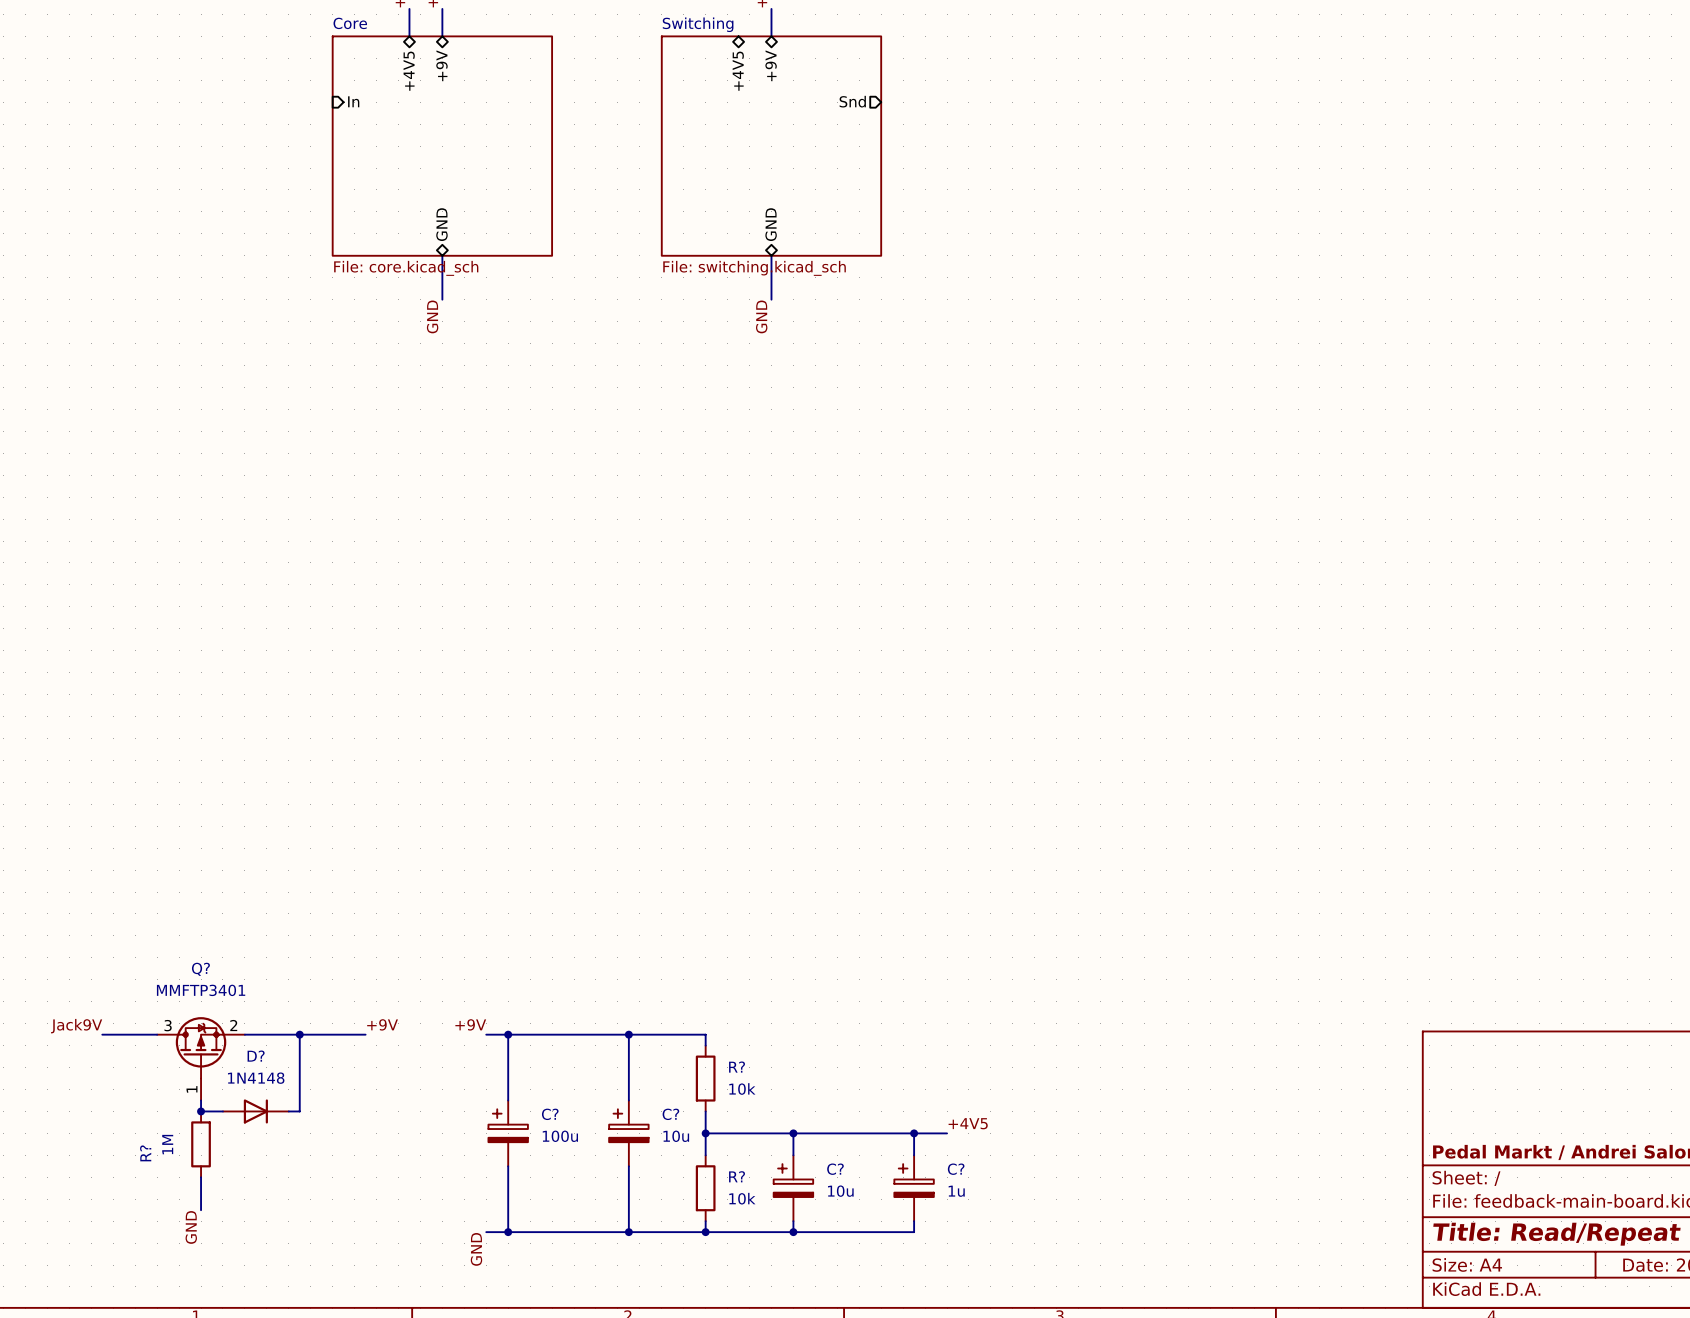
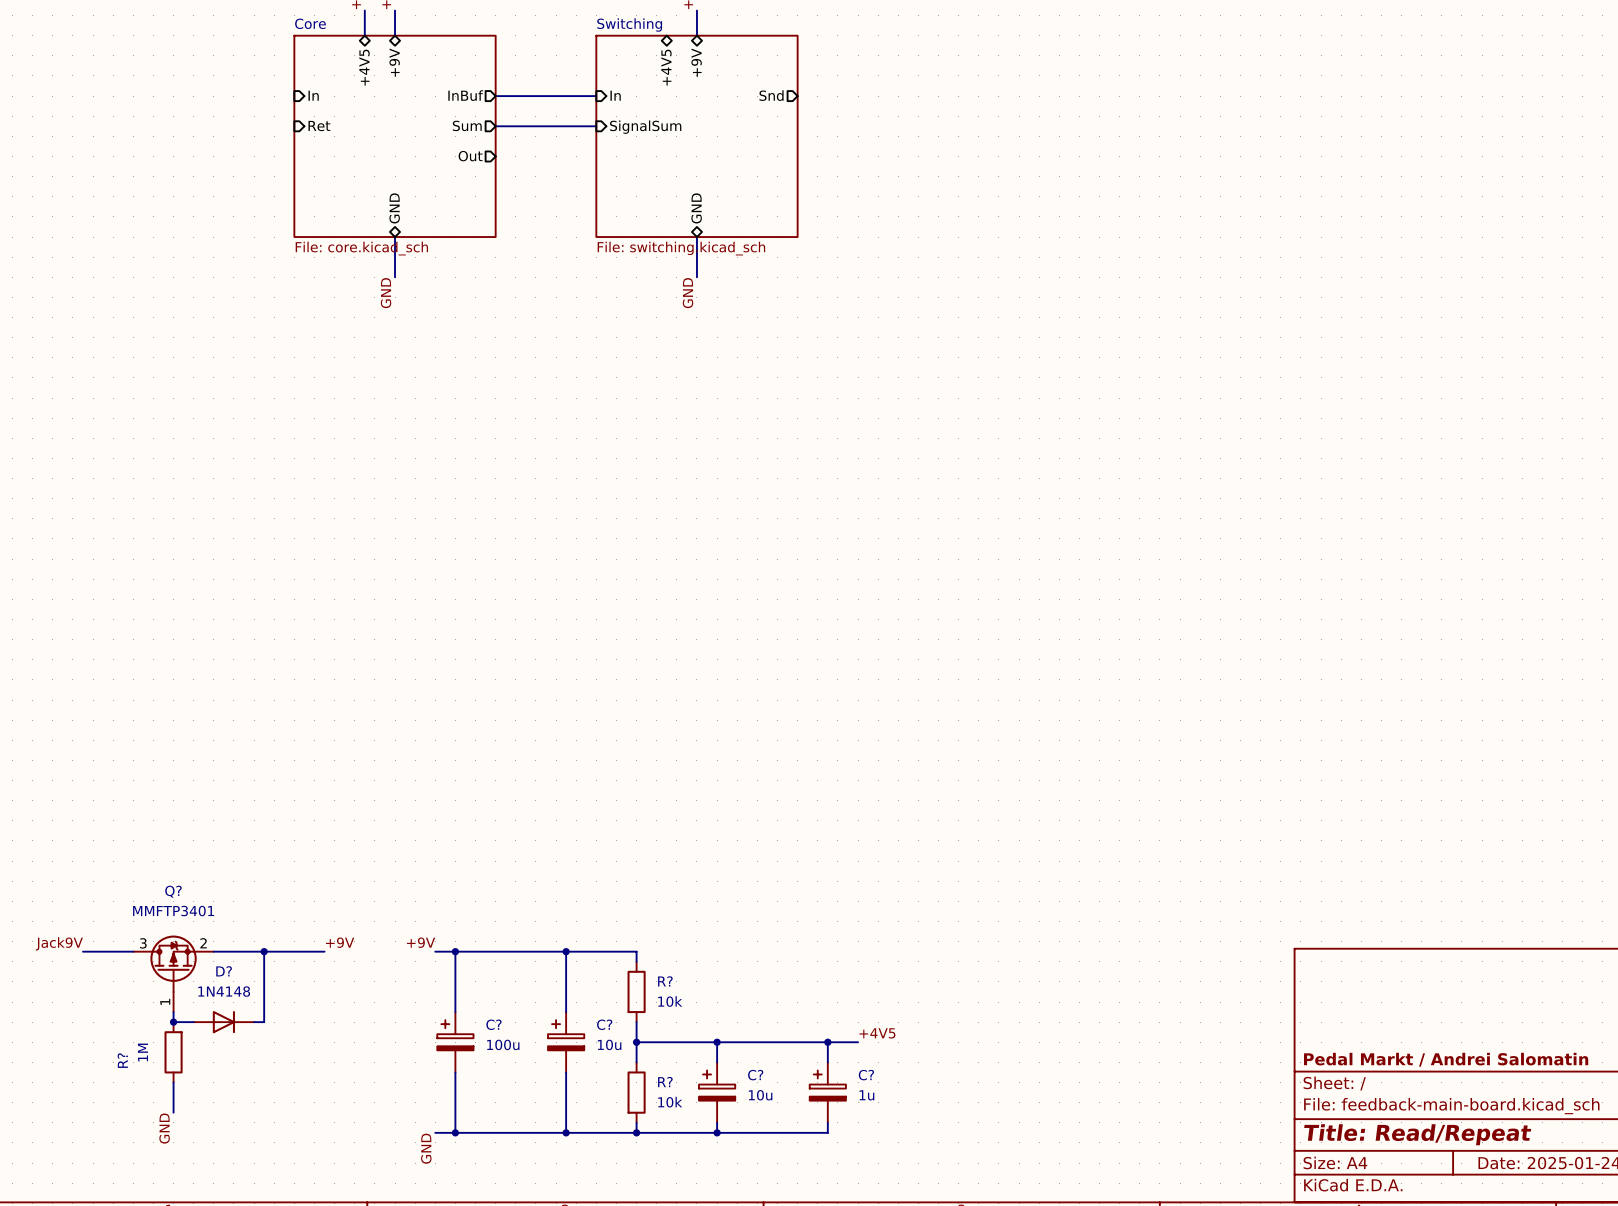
sheet pin: none -> InBuf (465, 95)
sheet pin: none -> In (615, 95)
wire: none -> (495, 96) (596, 96)
sheet pin: none -> Ret (319, 126)
sheet pin: none -> Sum (467, 125)
wire: none -> (495, 126) (596, 126)
sheet pin: none -> SignalSum (645, 127)
sheet pin: none -> Out (470, 156)

